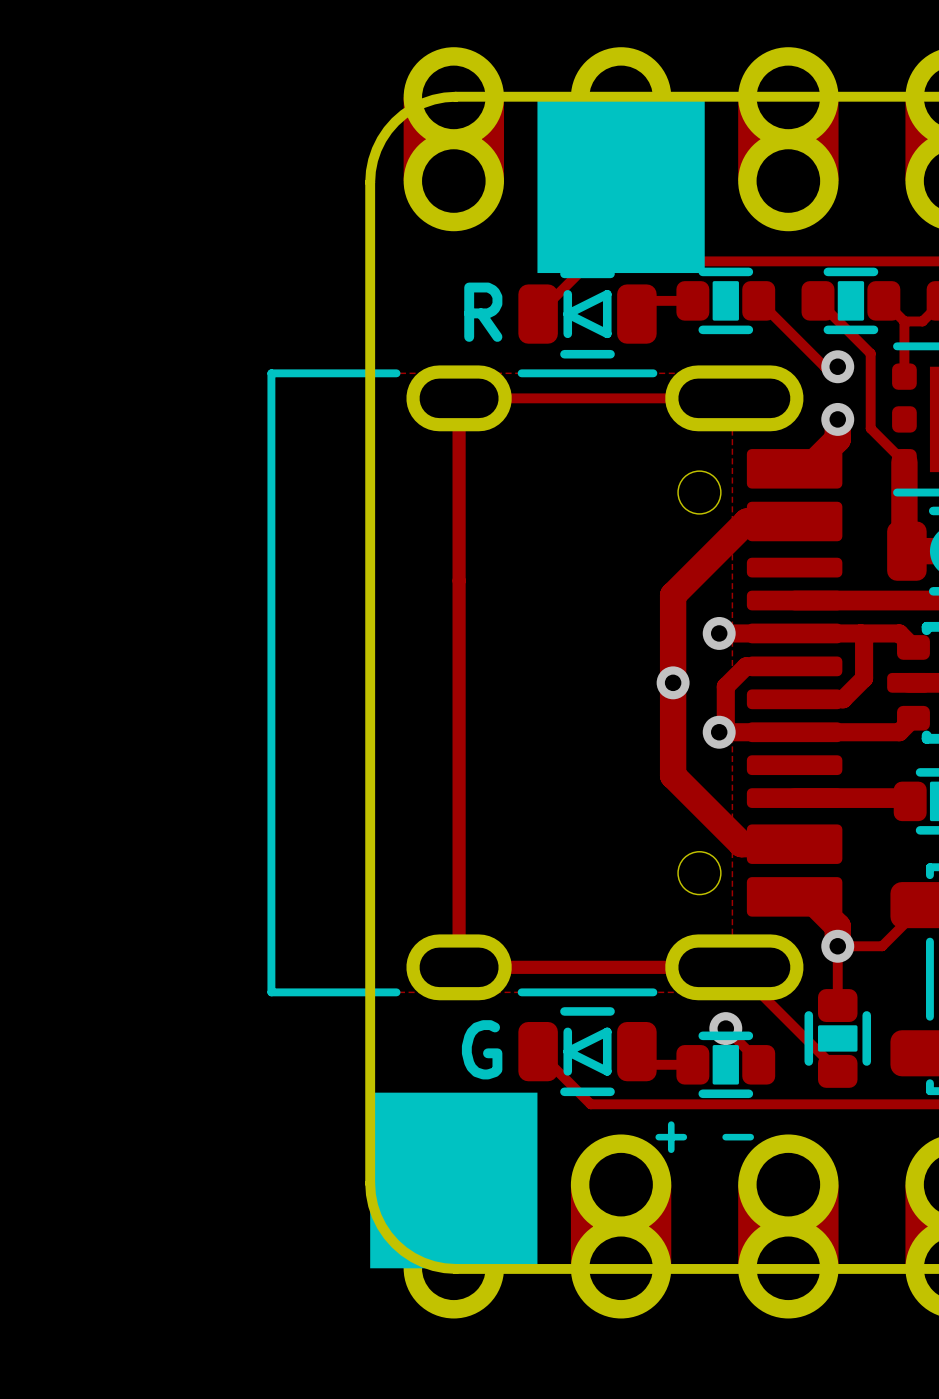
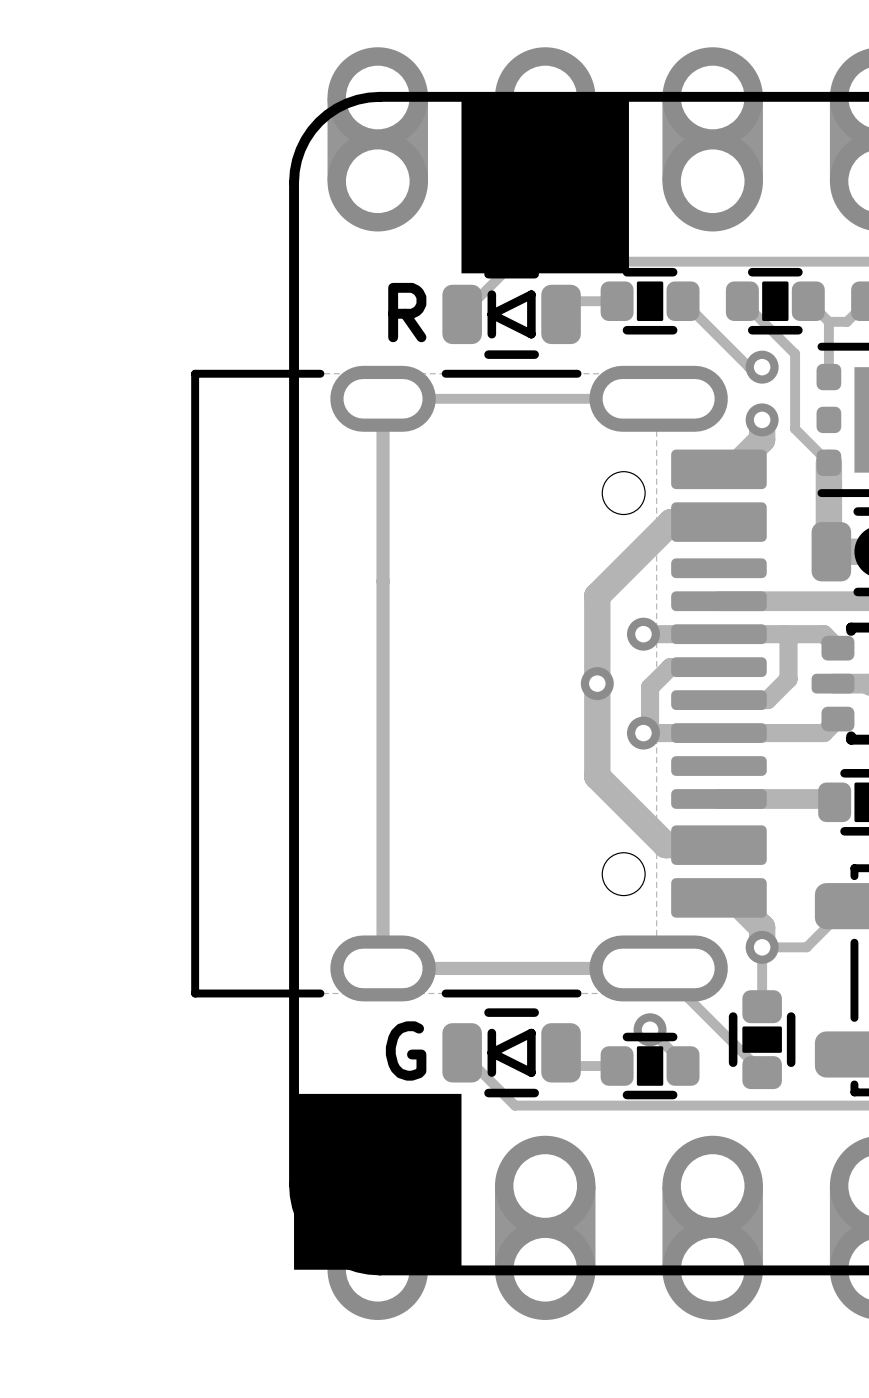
text: + (671, 1137) -> none
text: - (738, 1137) -> none

